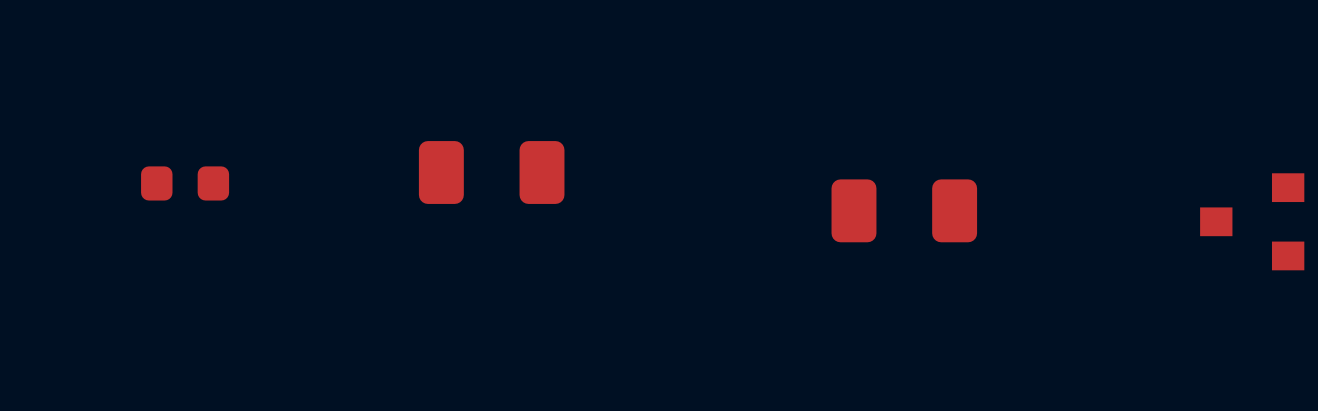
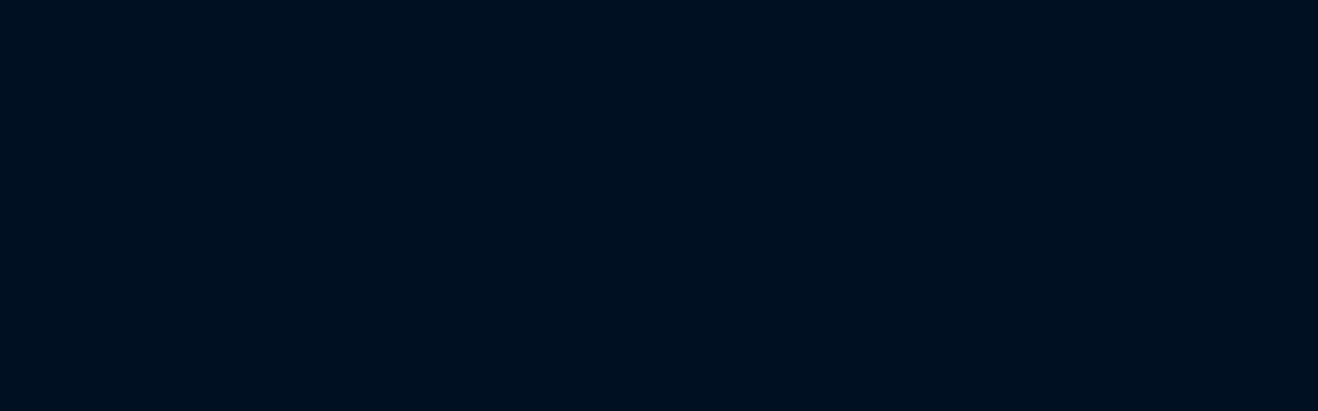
part: (491, 172) -> none
part: (185, 183) -> none
part: (904, 210) -> none
part: (1252, 221) -> none

